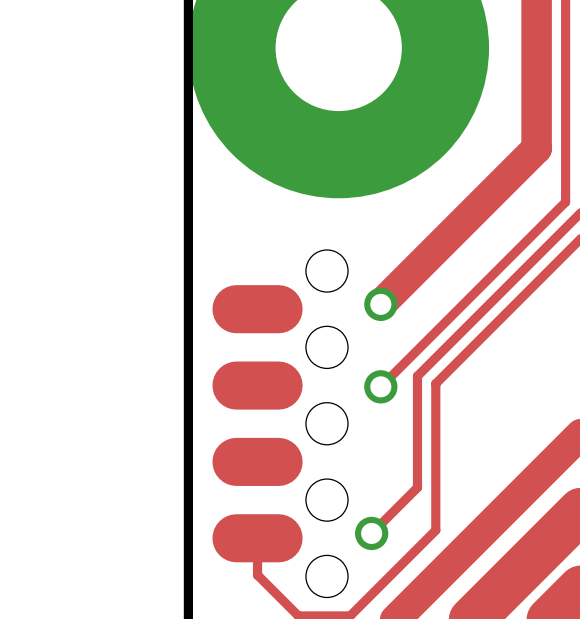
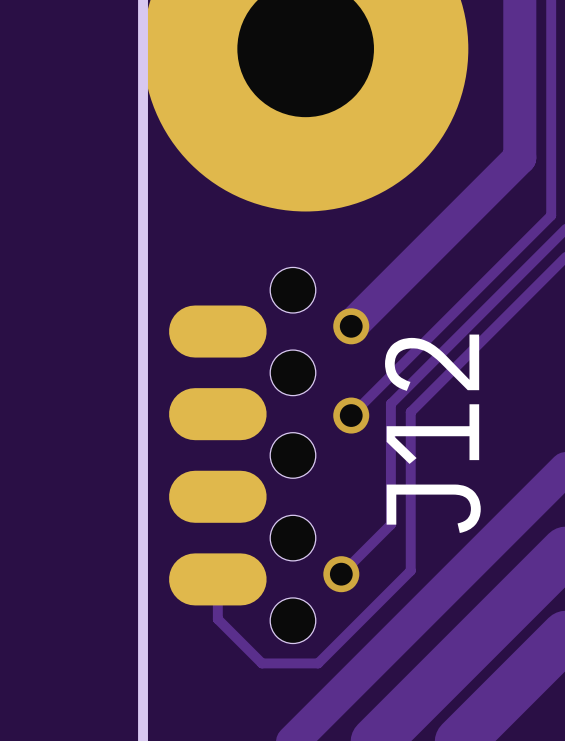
J12 name: none -> J12 (432, 433)

